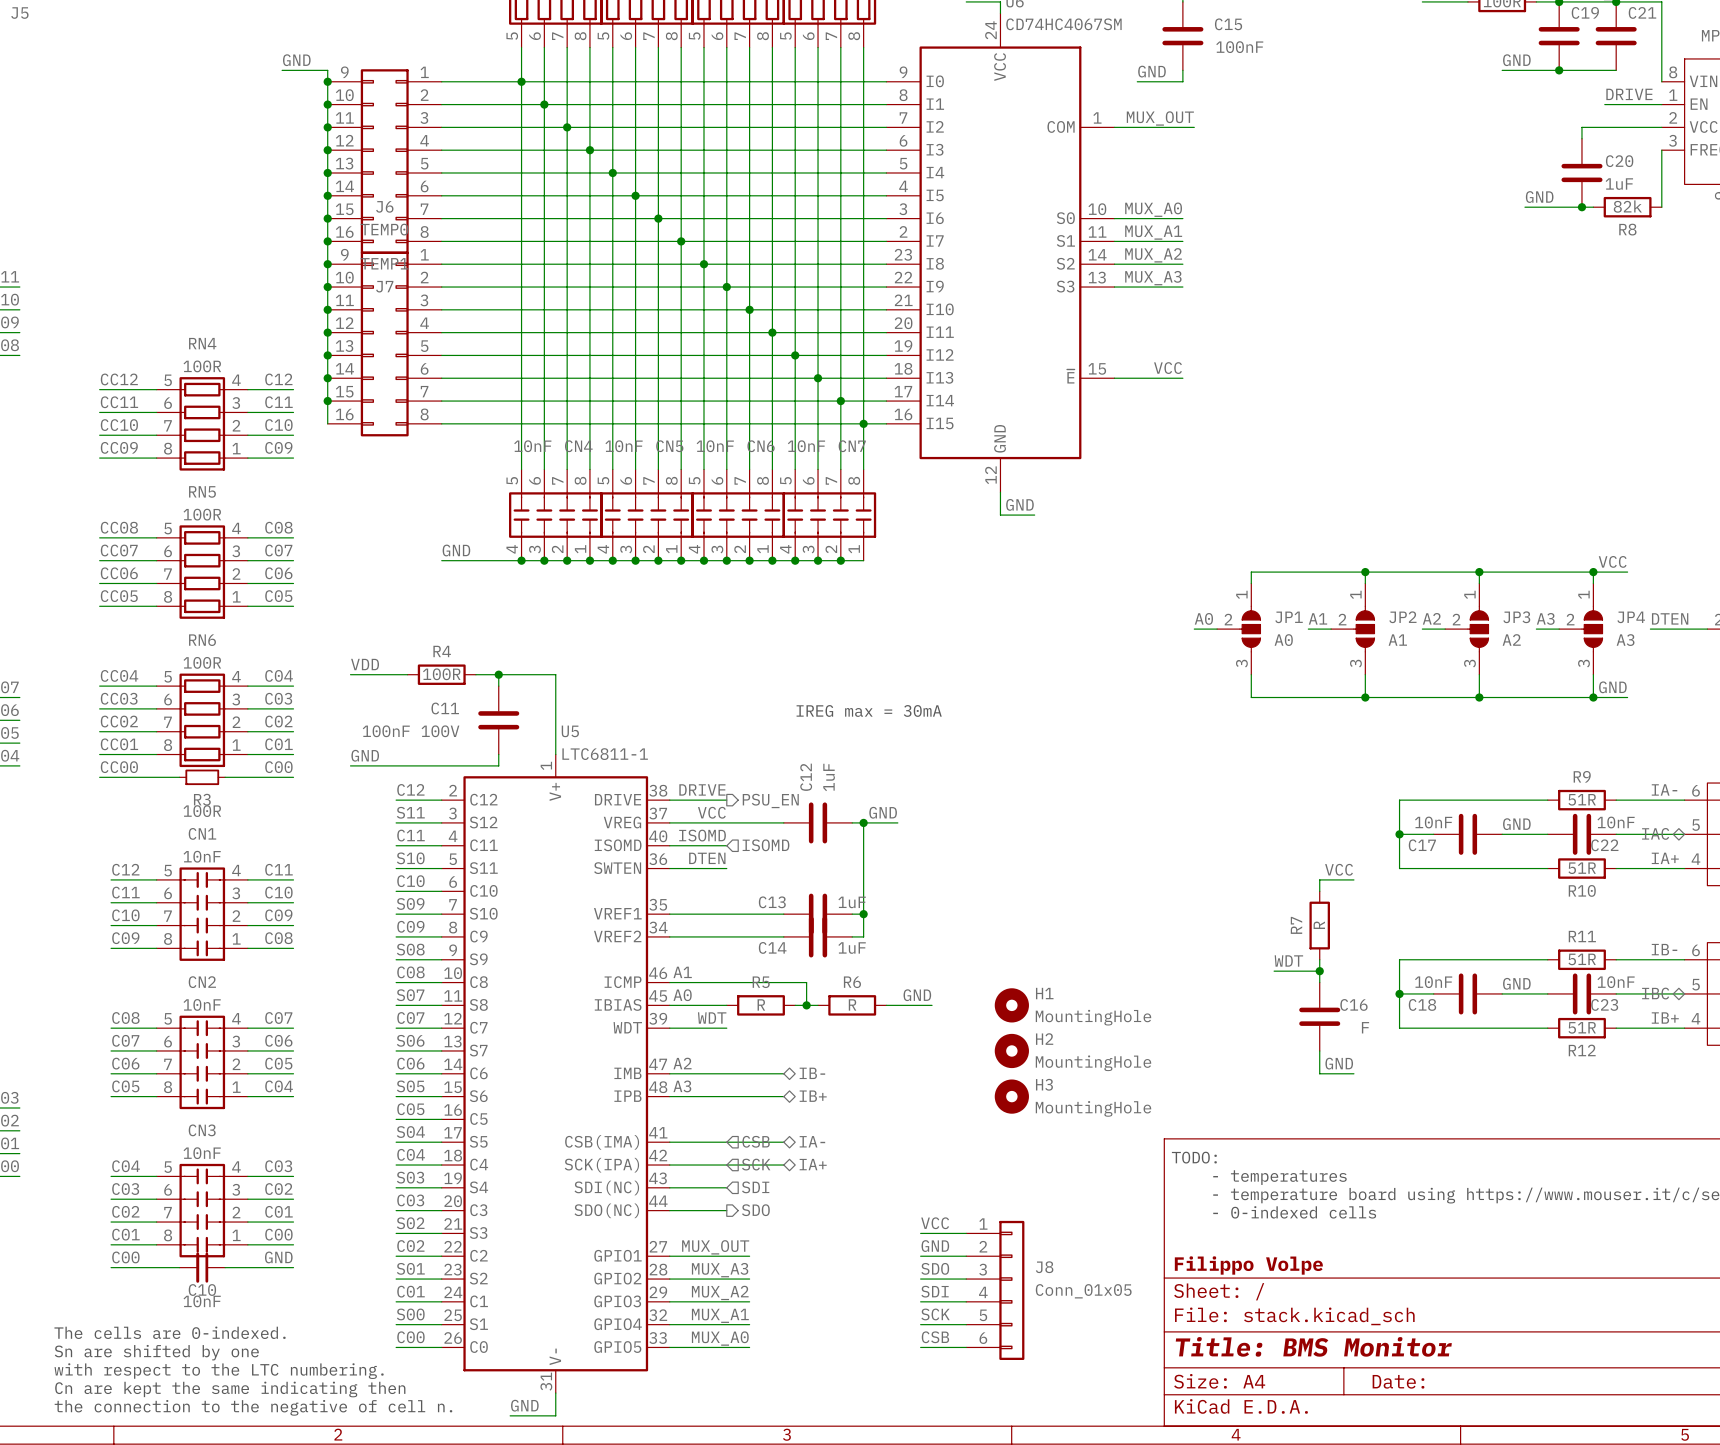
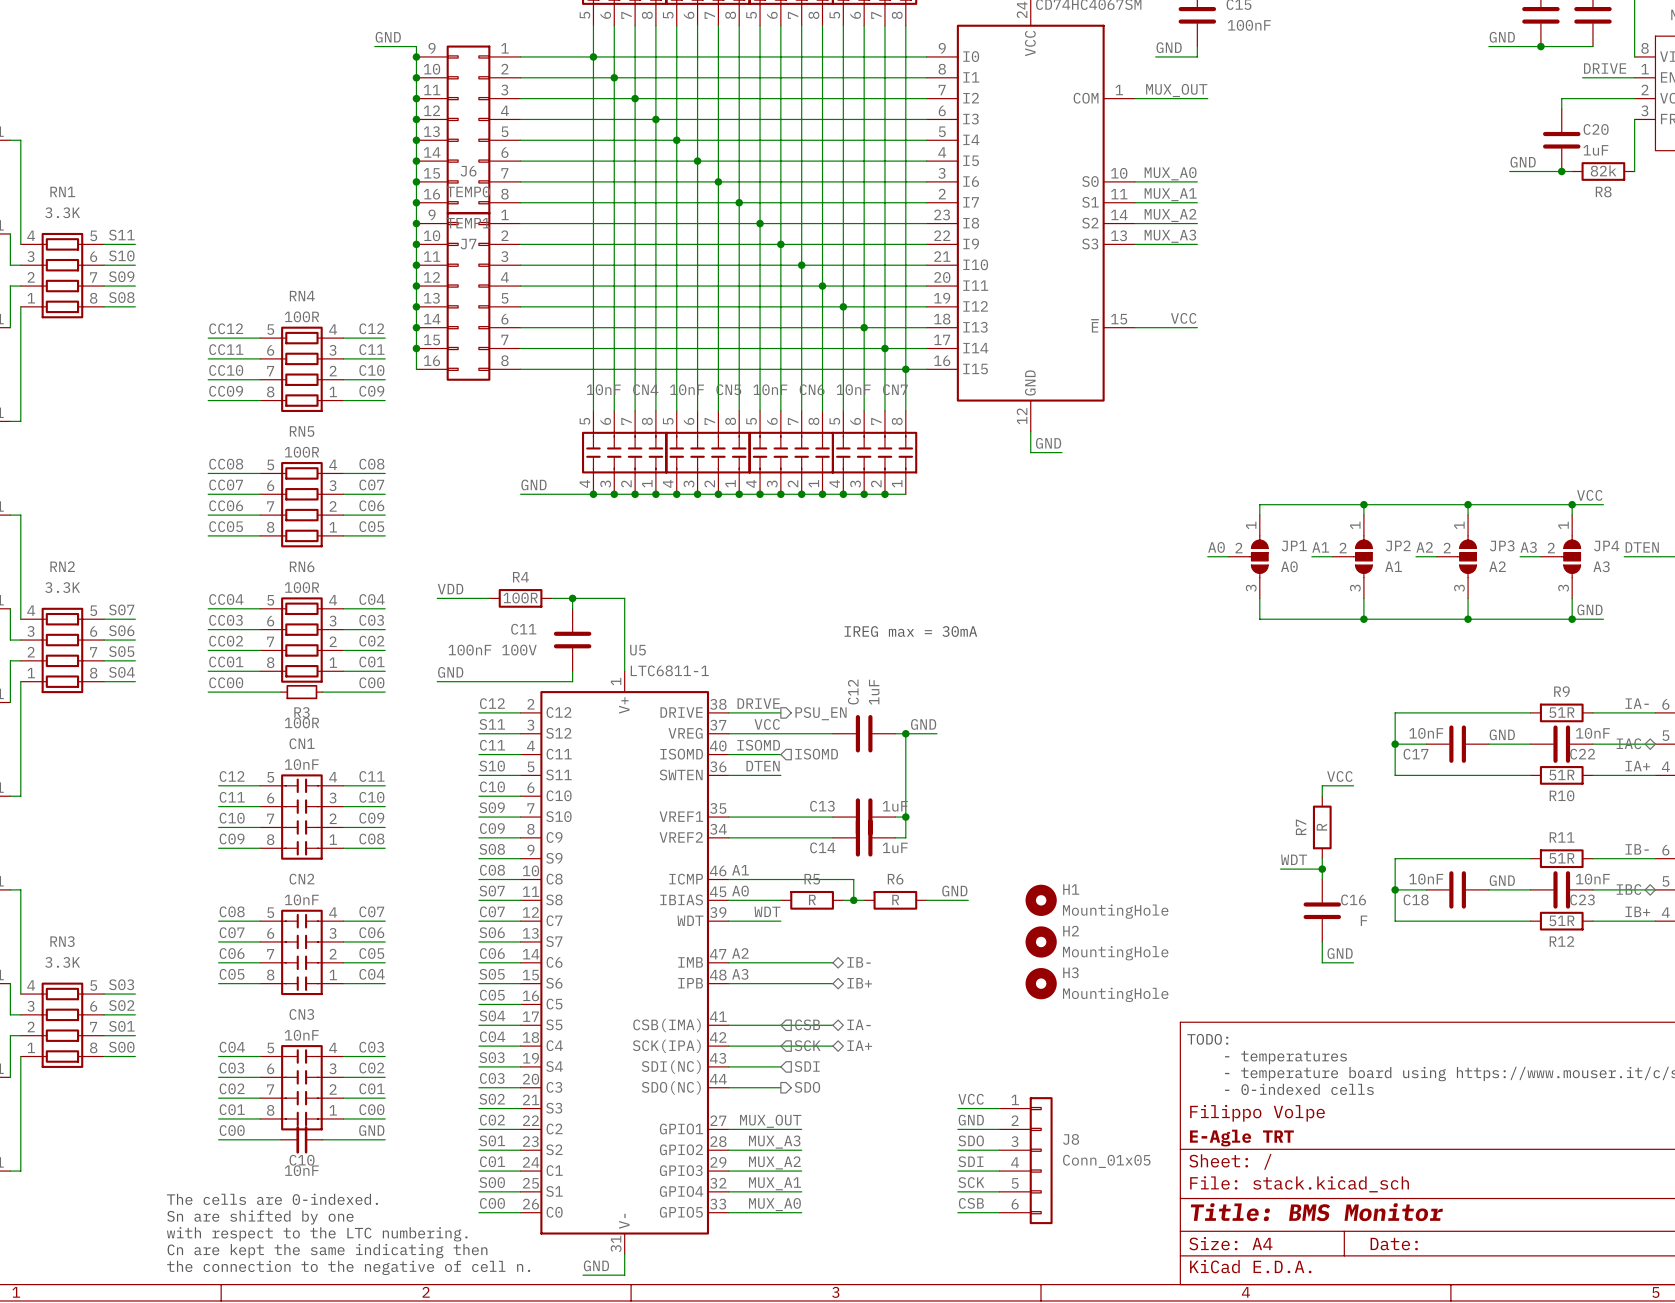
title block: none -> Filippo Volpe (1257, 1113)
title block: Filippo Volpe (1248, 1265) -> E-Agle TRT (1241, 1138)

